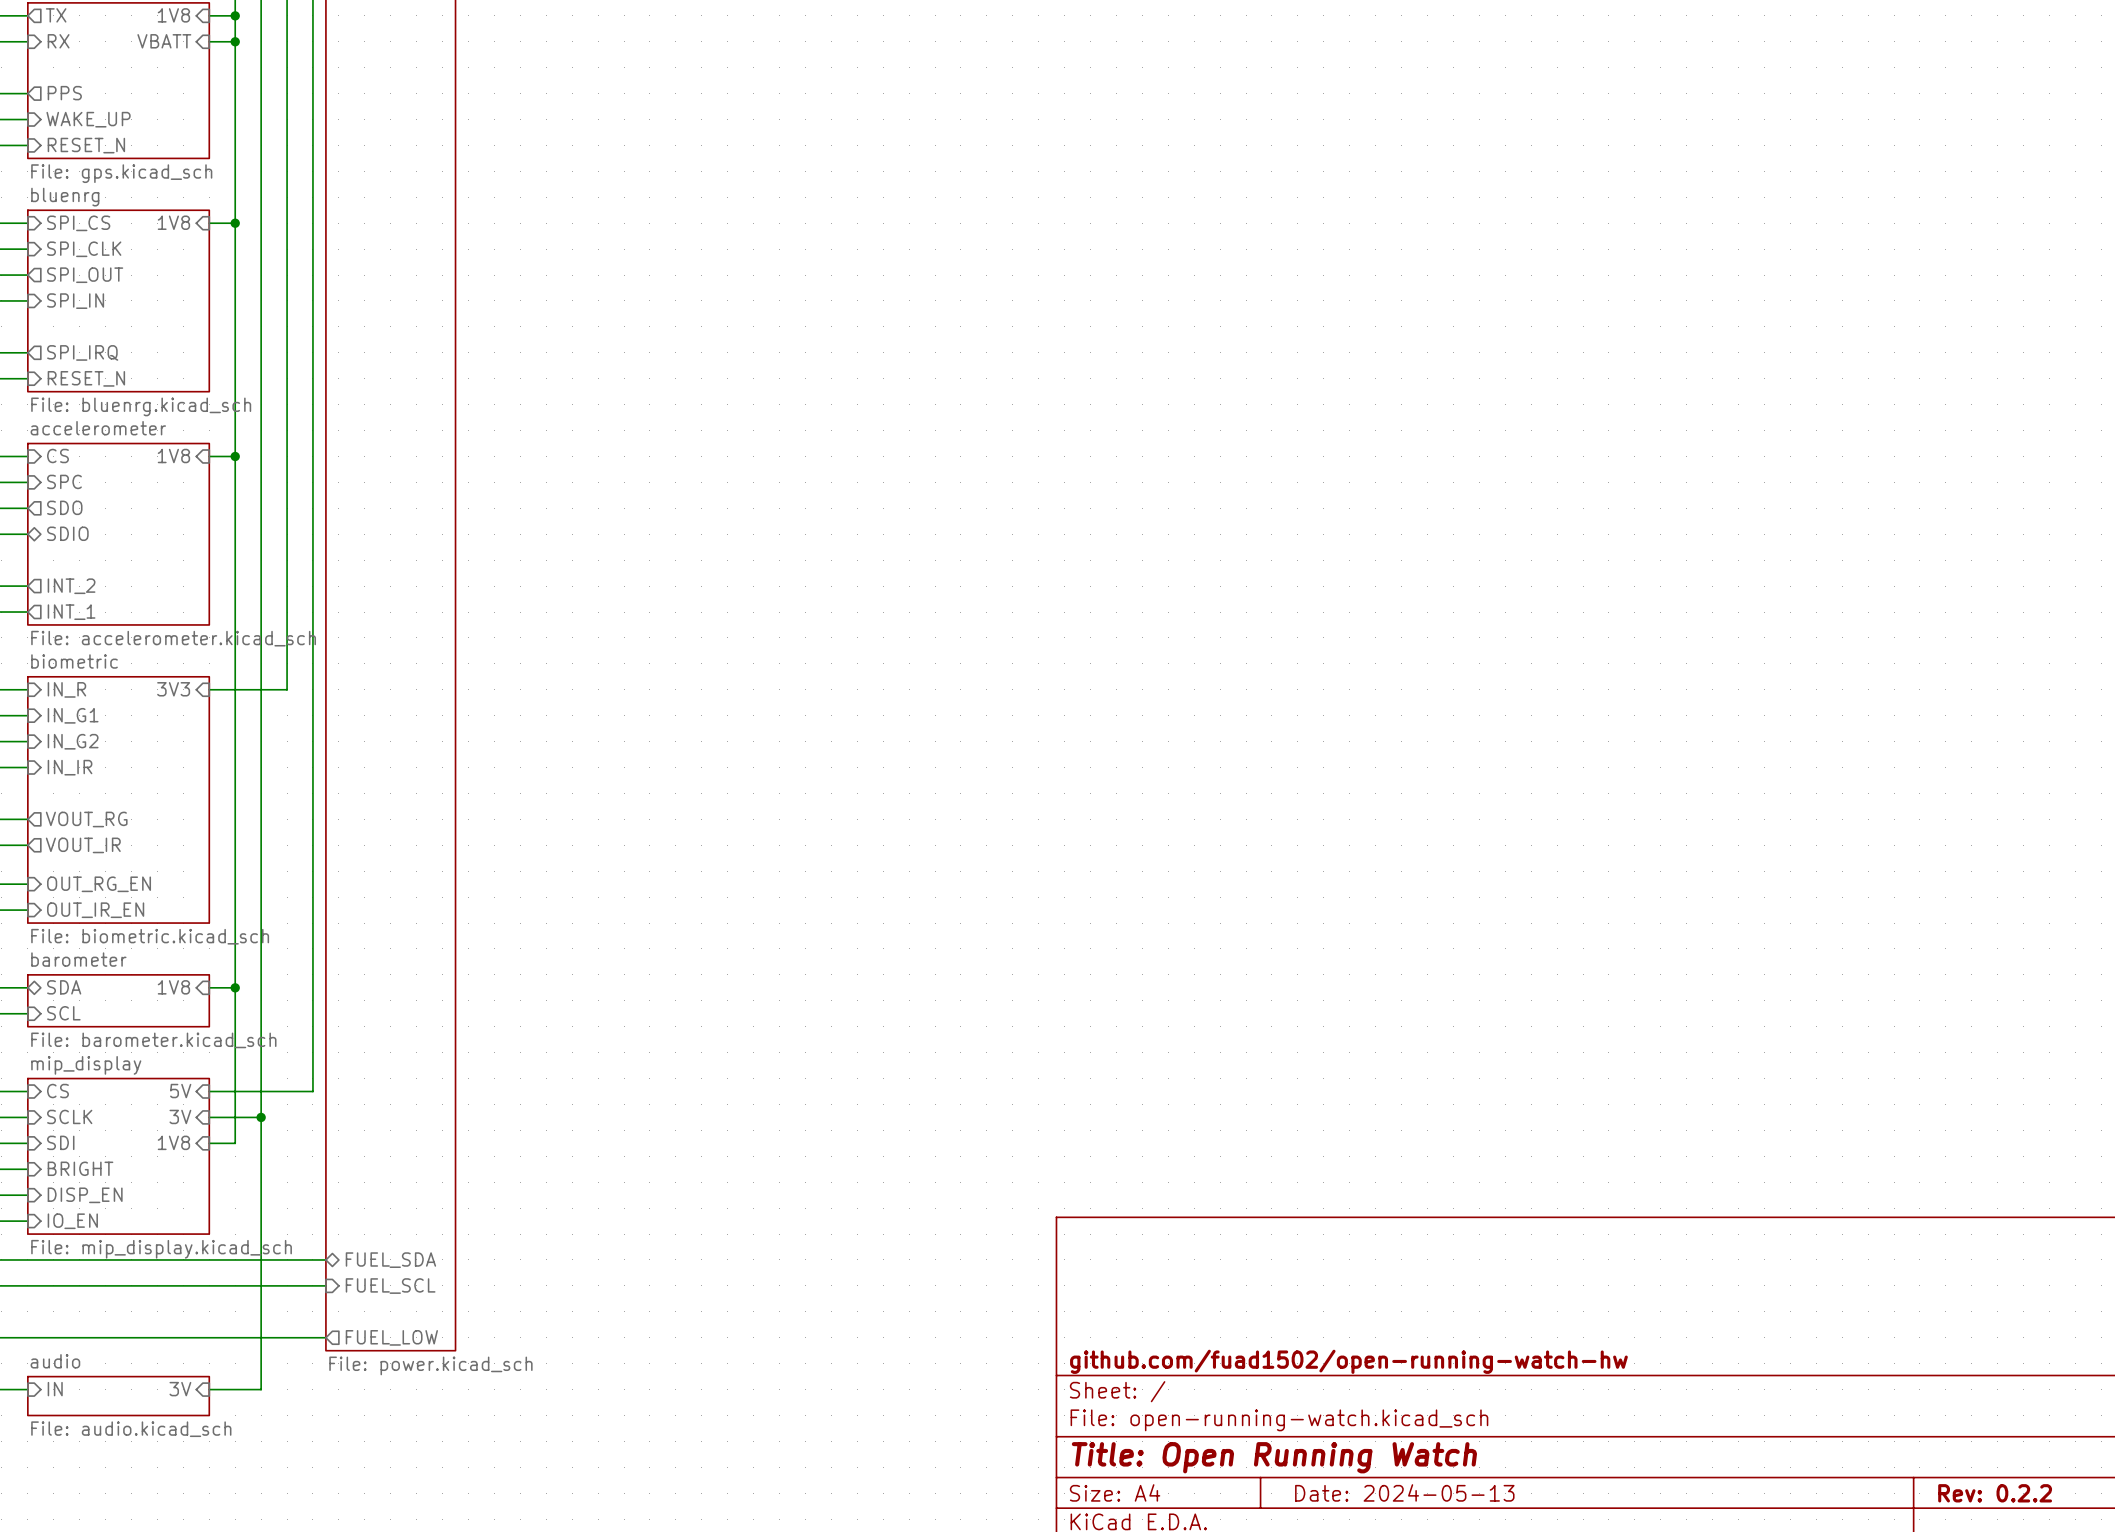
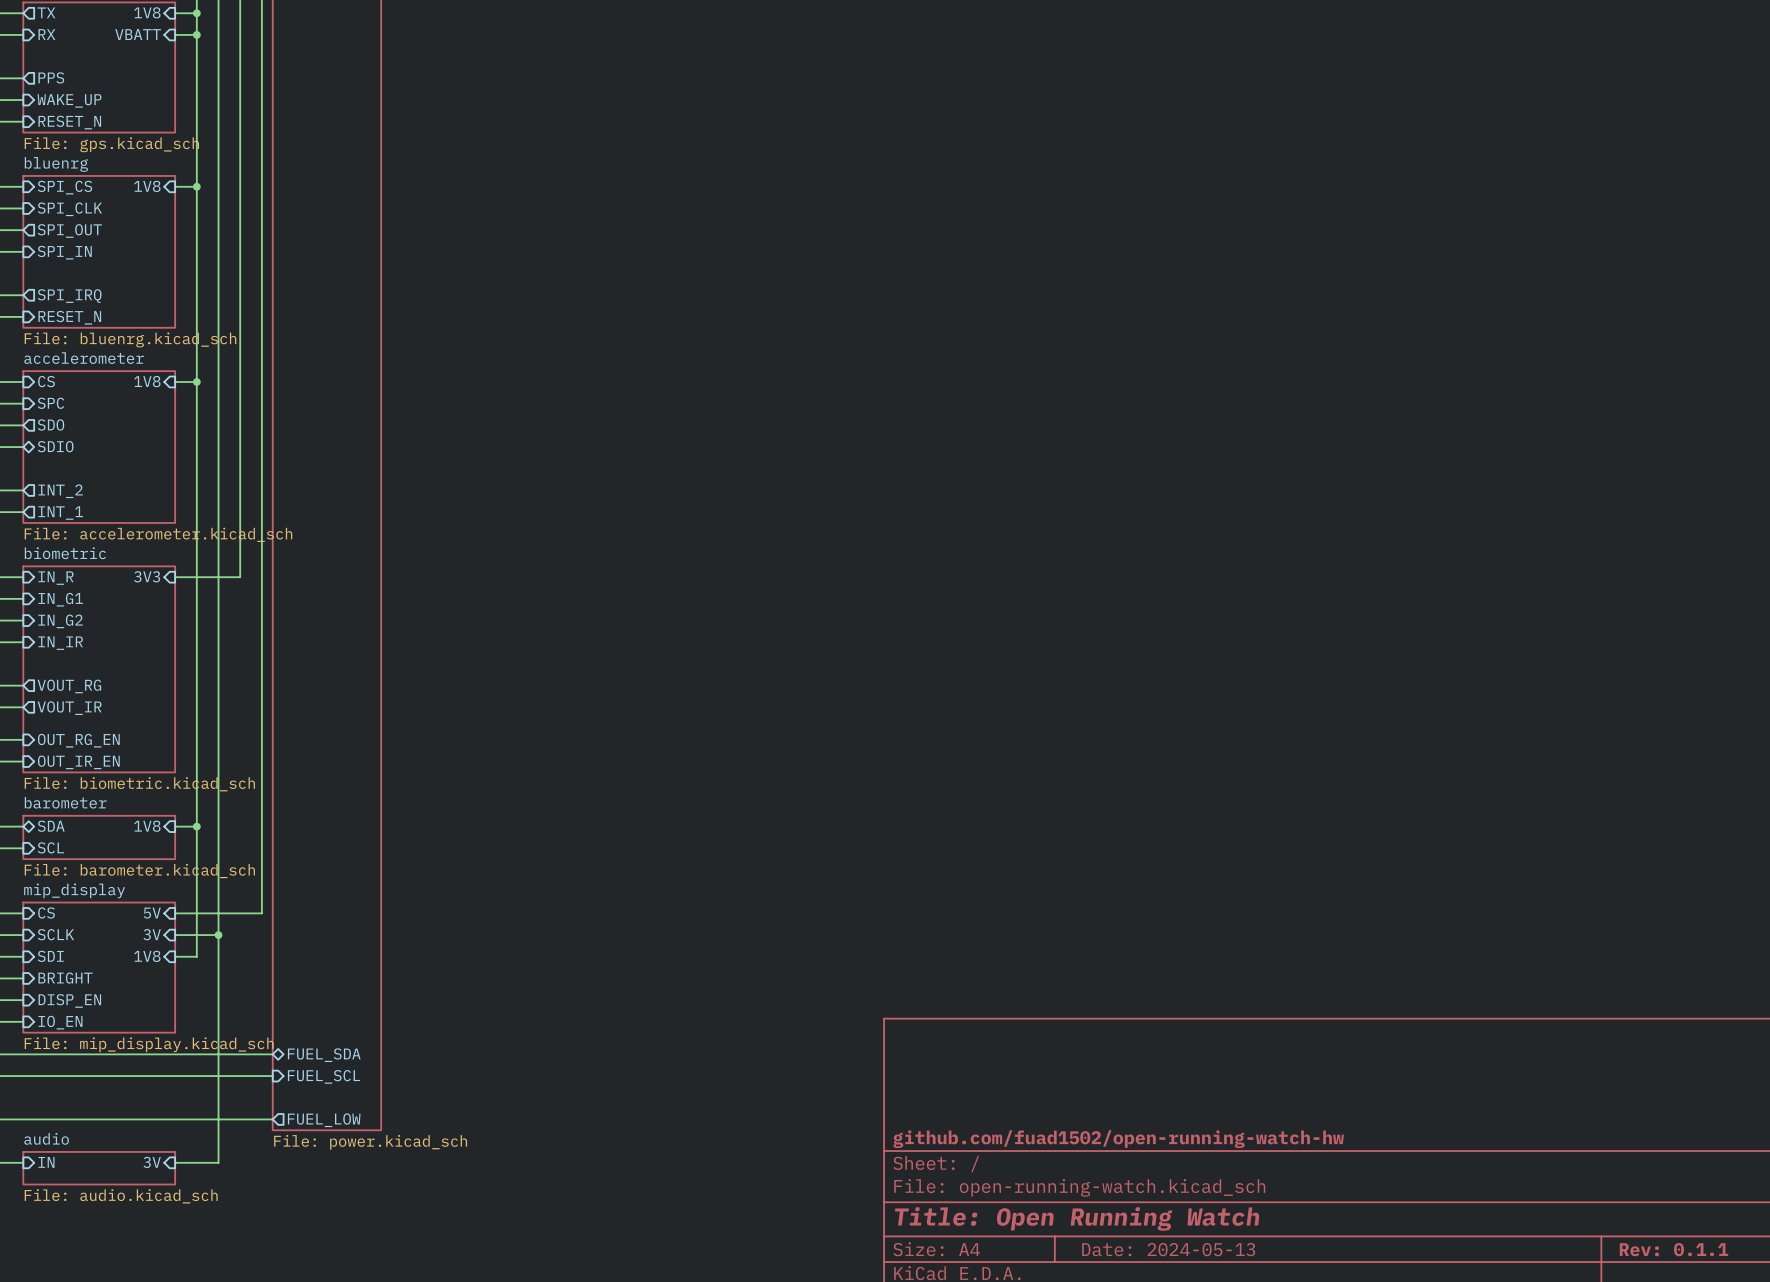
title block: Rev: 0.2.2 (1995, 1493) -> Rev: 0.1.1 (1673, 1249)

